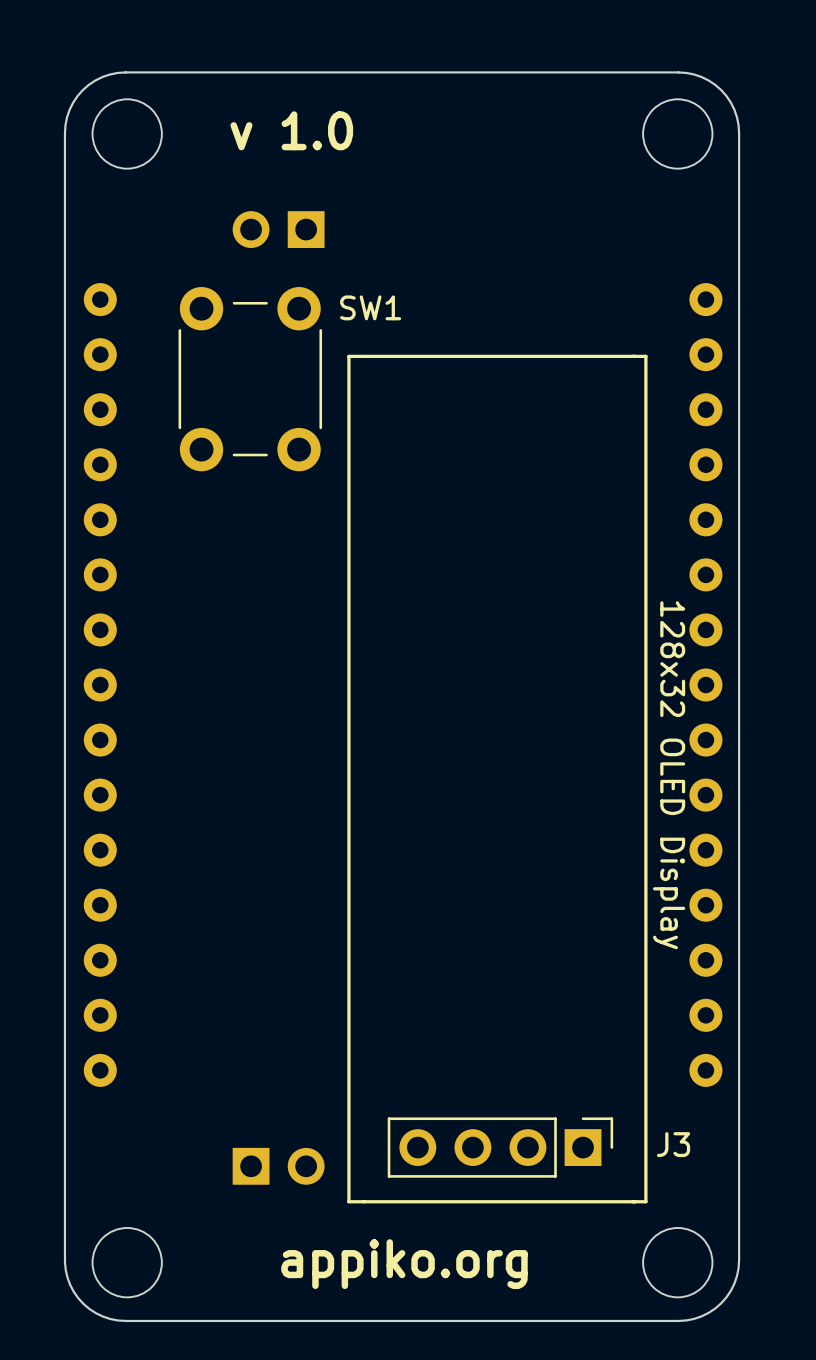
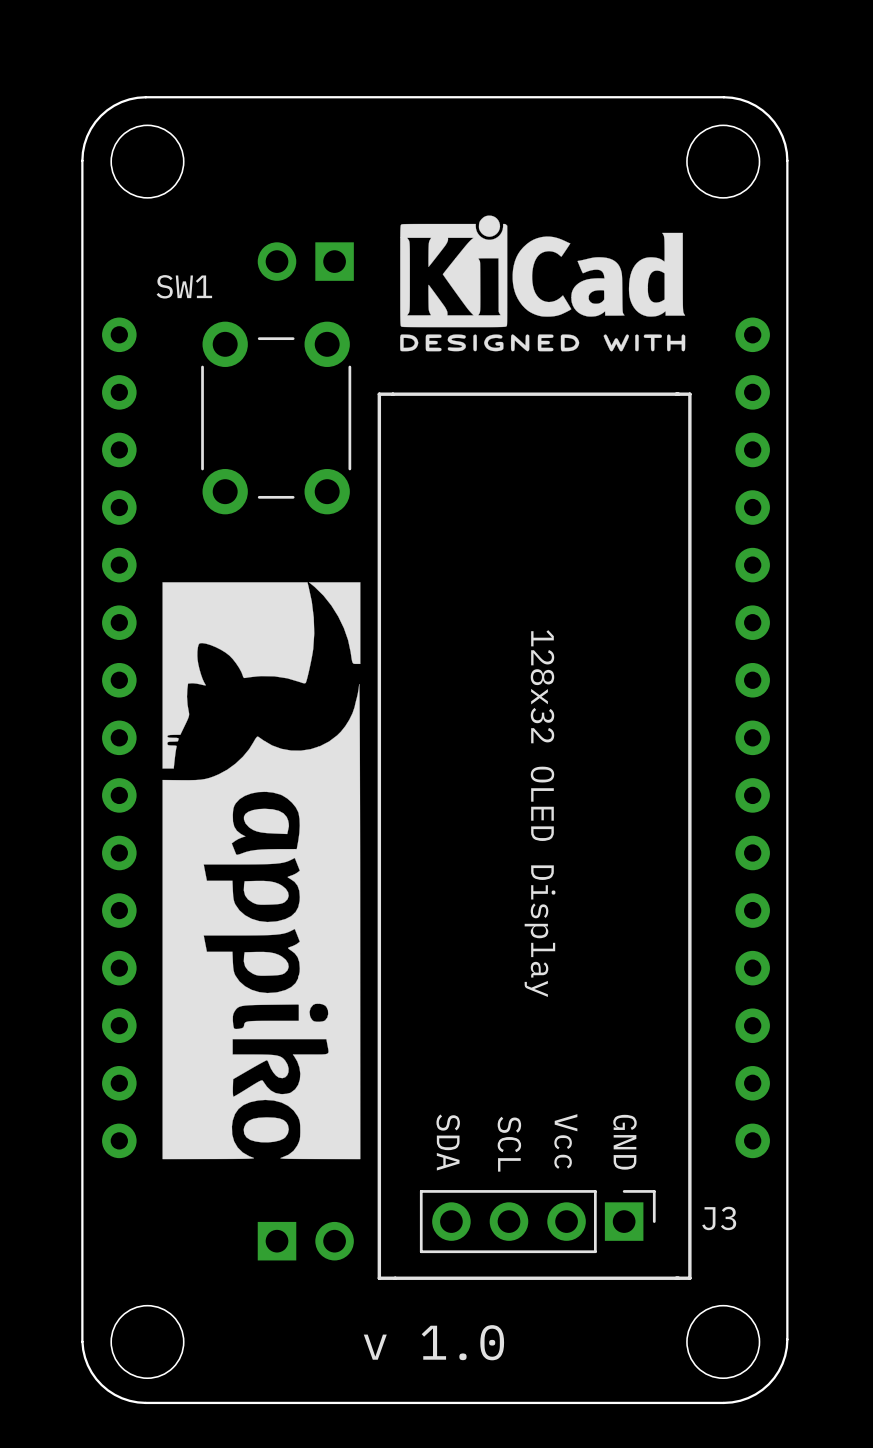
text: v 1.0 (291, 130) -> none
drawing: none -> [400, 215, 686, 352]
SW1 name position: SW1 (370, 307) -> SW1 (184, 286)
drawing: none -> [162, 582, 361, 1160]
J3 text position: 128x32 OLED Display (669, 775) -> 128x32 OLED Display (540, 813)
J3 text: none -> Vcc (565, 1141)
J3 text: none -> GND (624, 1142)
J3 text: none -> SDA (448, 1142)
J3 text: none -> SCL (509, 1144)
text: appiko.org (404, 1264) -> v 1.0 (433, 1342)

